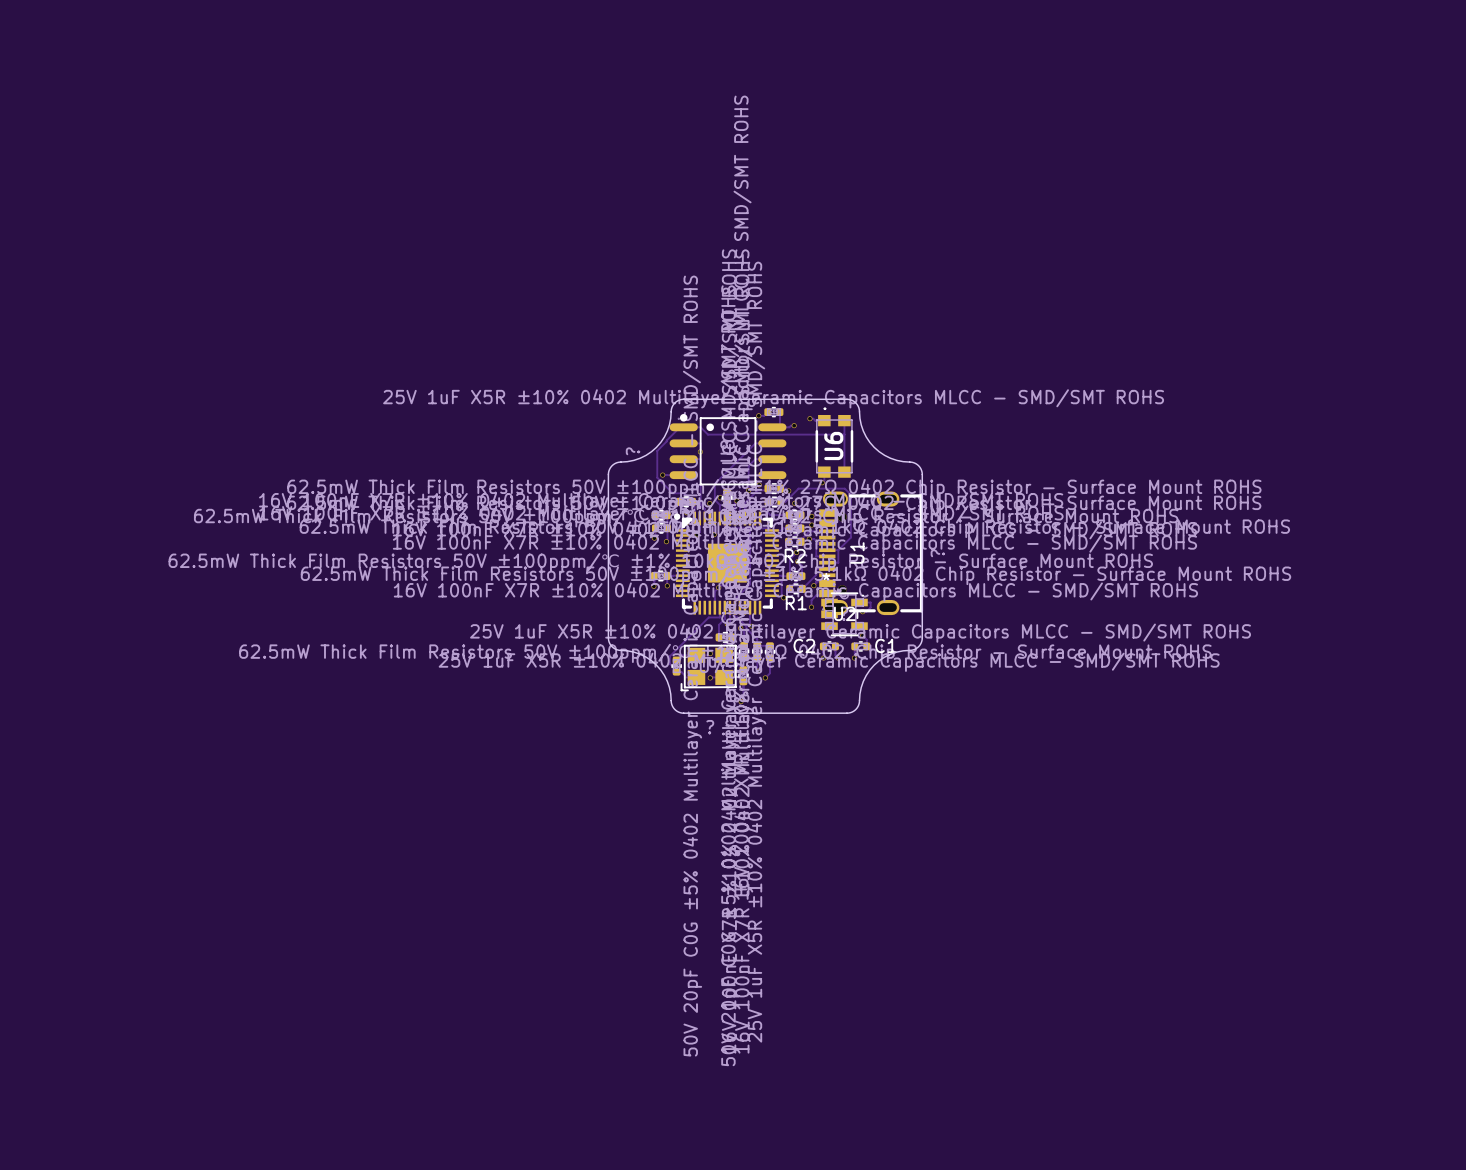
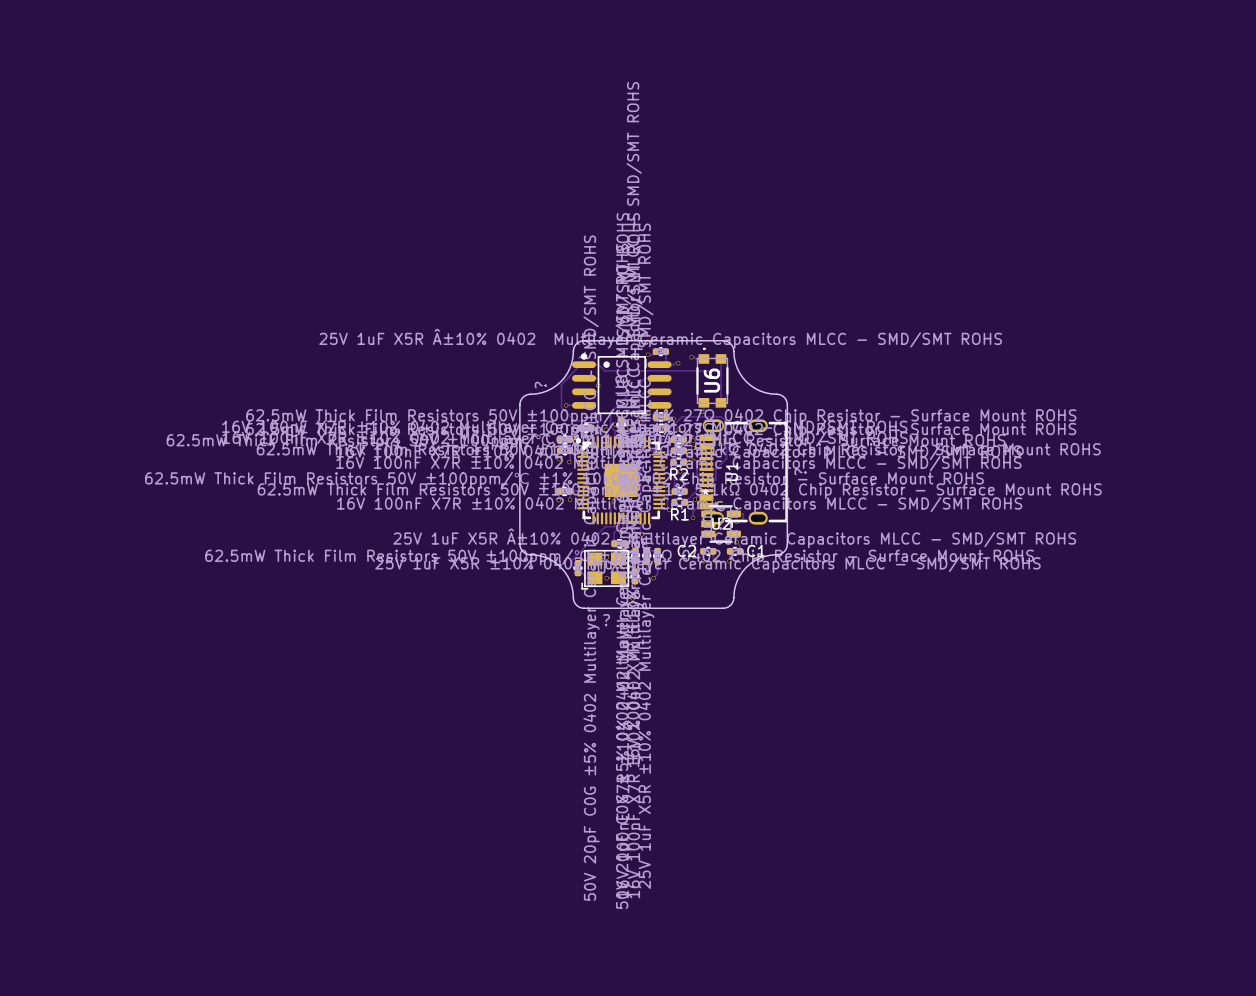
part value: 25V 1uF X5R ±10% 0402 Multilayer Ceramic Capacitors MLCC - SMD/SMT ROHS (773, 398) -> 25V 1uF X5R Â±10% 0402 Multilayer Ceramic Capacitors MLCC - SMD/SMT ROHS (660, 338)
C1 value: 25V 1uF X5R ±10% 0402 Multilayer Ceramic Capacitors MLCC - SMD/SMT ROHS (860, 633) -> 25V 1uF X5R Â±10% 0402 Multilayer Ceramic Capacitors MLCC - SMD/SMT ROHS (734, 538)

